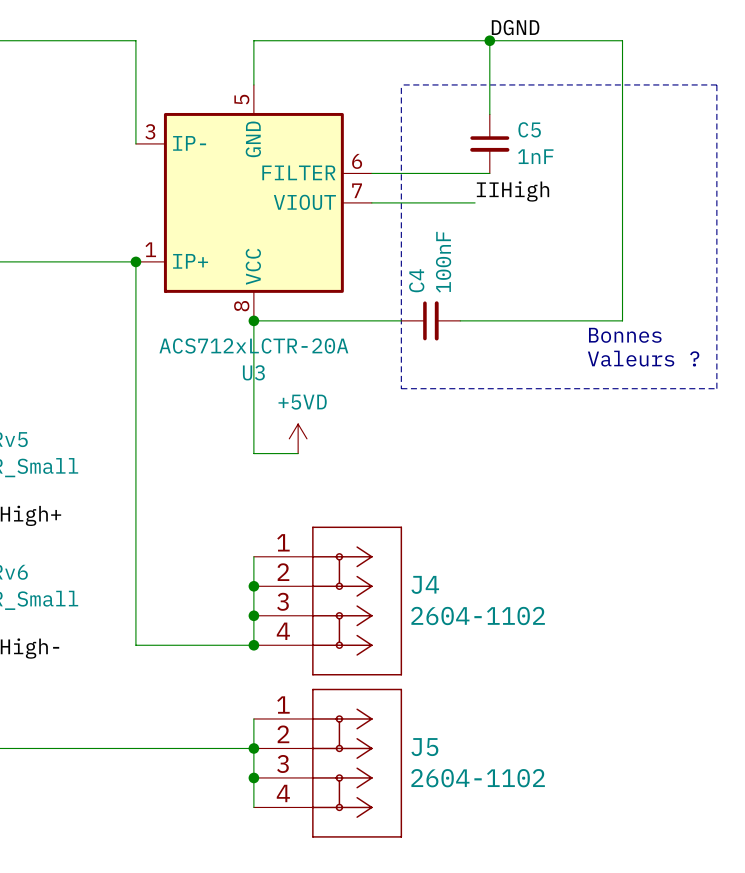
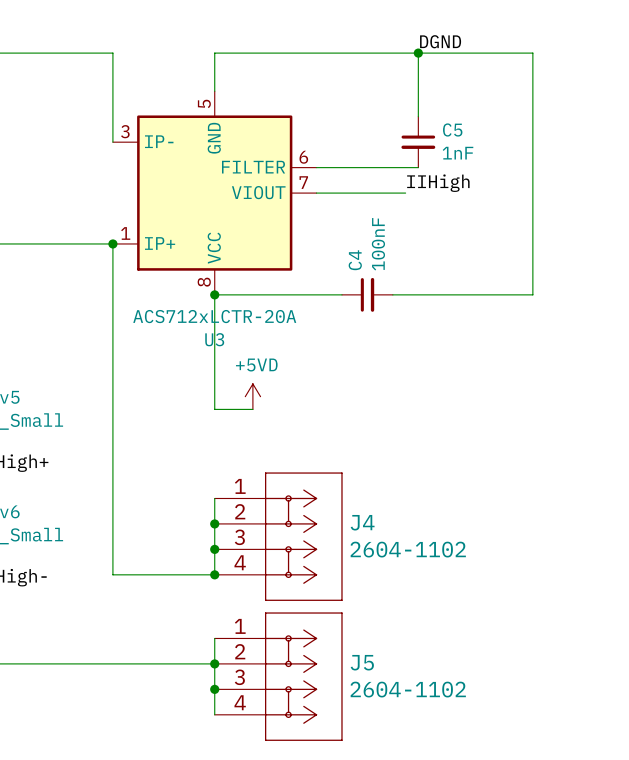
line: (401, 84) (716, 84) (716, 388) (401, 388) (401, 87) -> none
text: Bonnes (625, 335) -> none
text: Valeurs ? (643, 358) -> none

